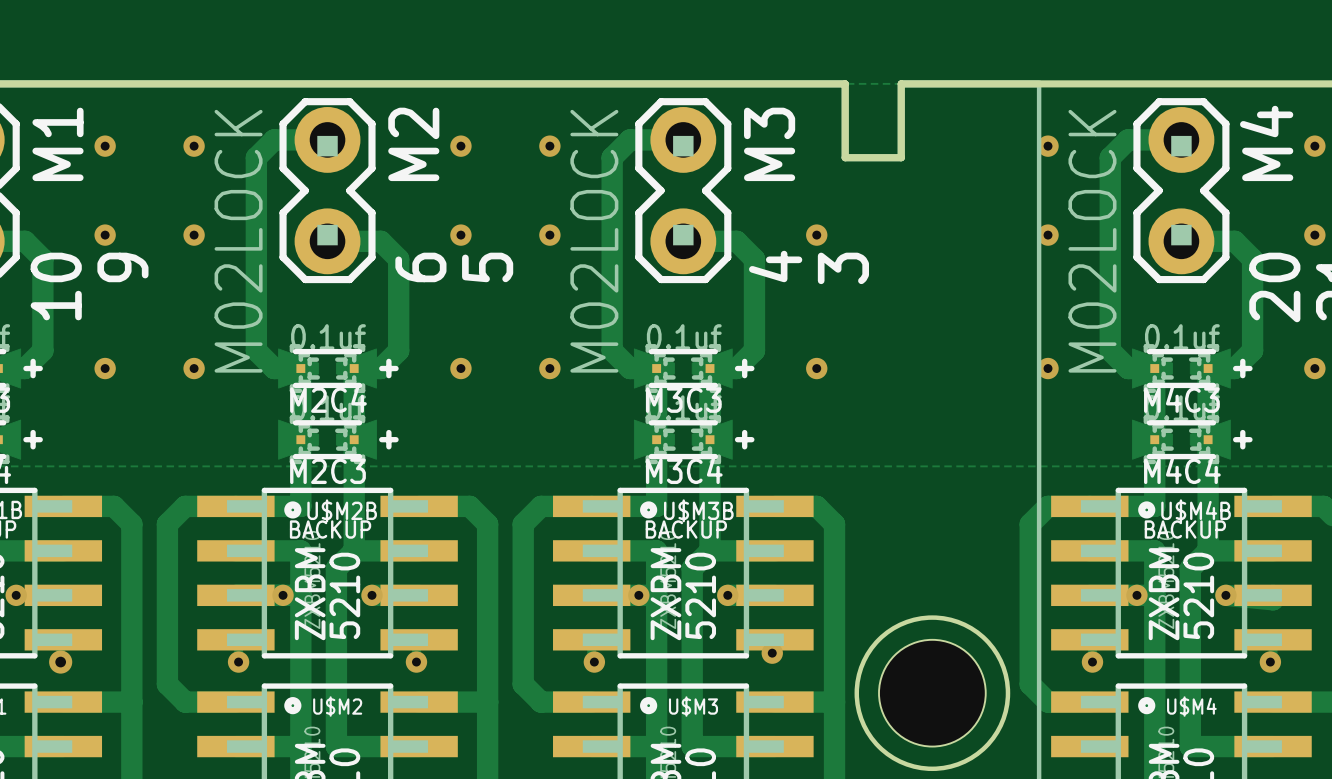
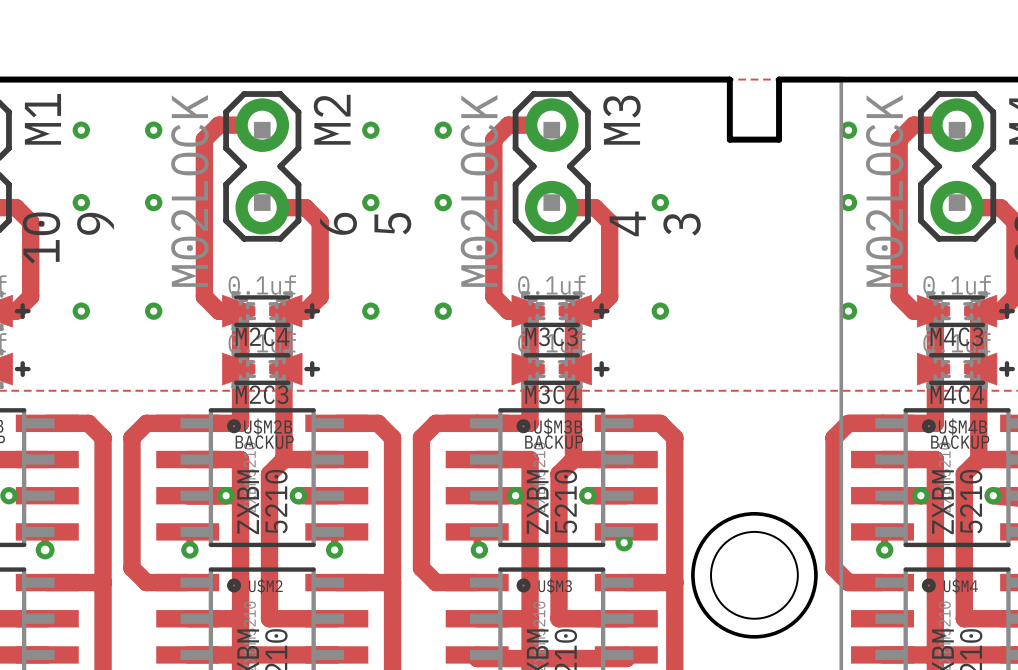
board edge: (845, 83) (845, 157) (901, 157) (901, 83) -> (683, 79) (729, 79)
board edge: (902, 83) (962, 83) -> (729, 79) (729, 139) (779, 139) (779, 79)

